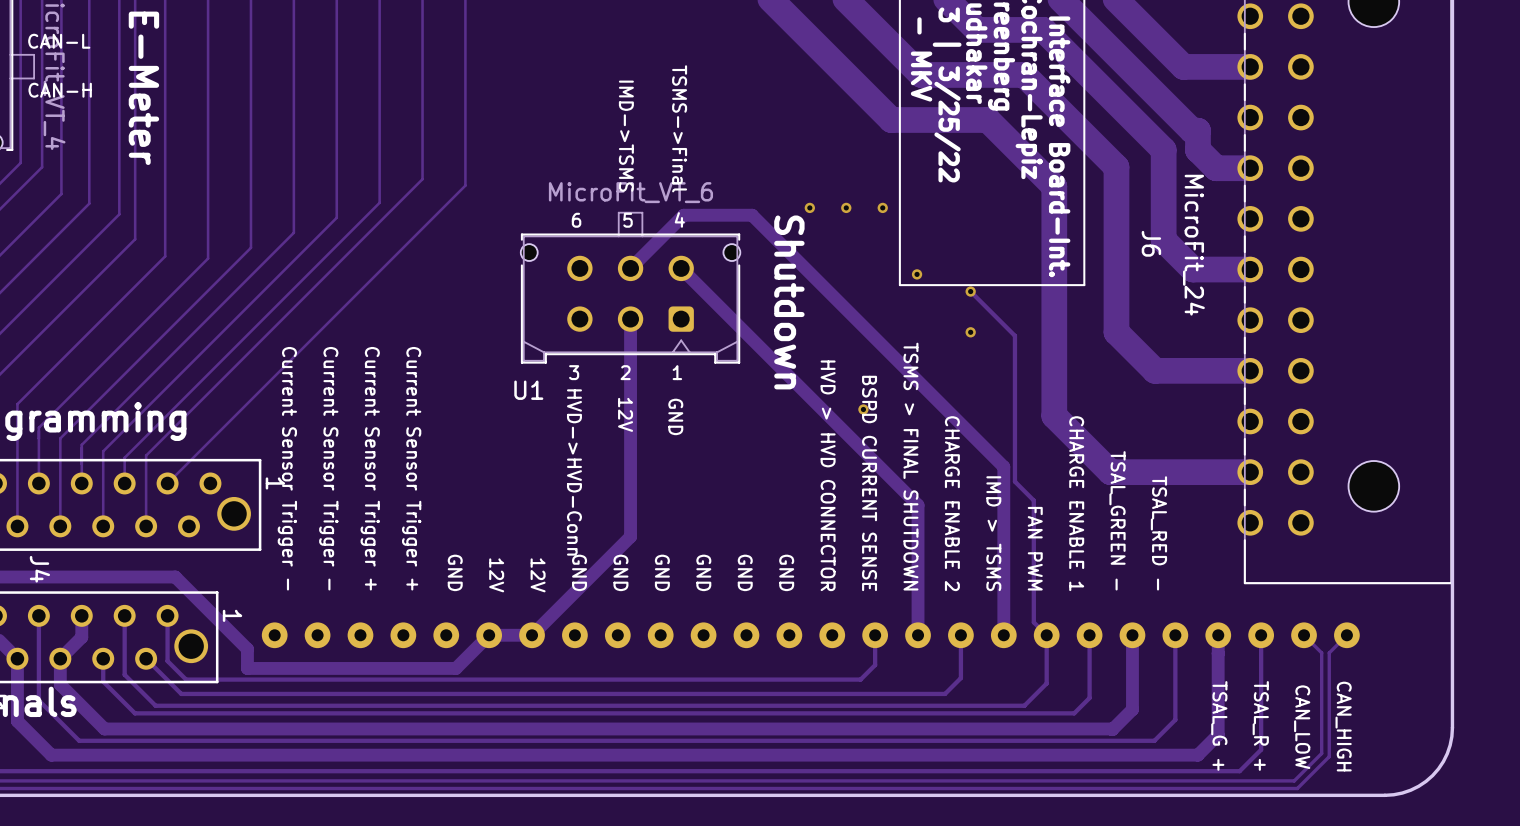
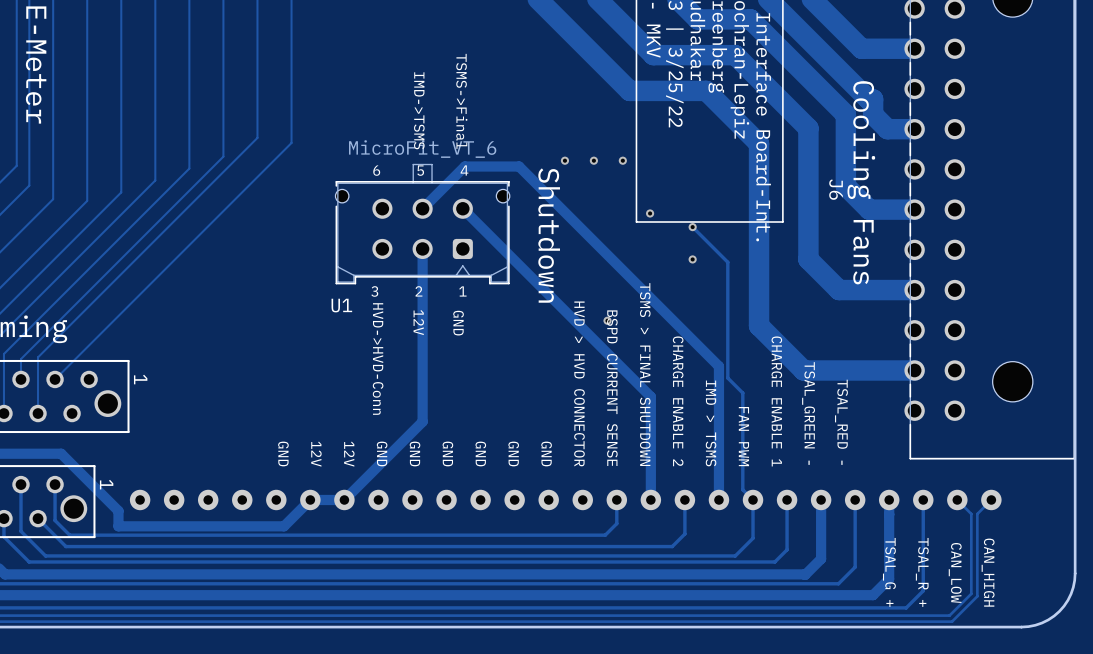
text: none -> Cooling Fans (861, 182)
J6 value: MicroFit_24 (1193, 245) -> none
text: Current Sensor Trigger - (287, 468) -> none
text: Current Sensor Trigger - (328, 468) -> none
text: Current Sensor Trigger + (370, 468) -> none
text: Current Sensor Trigger + (411, 468) -> none

